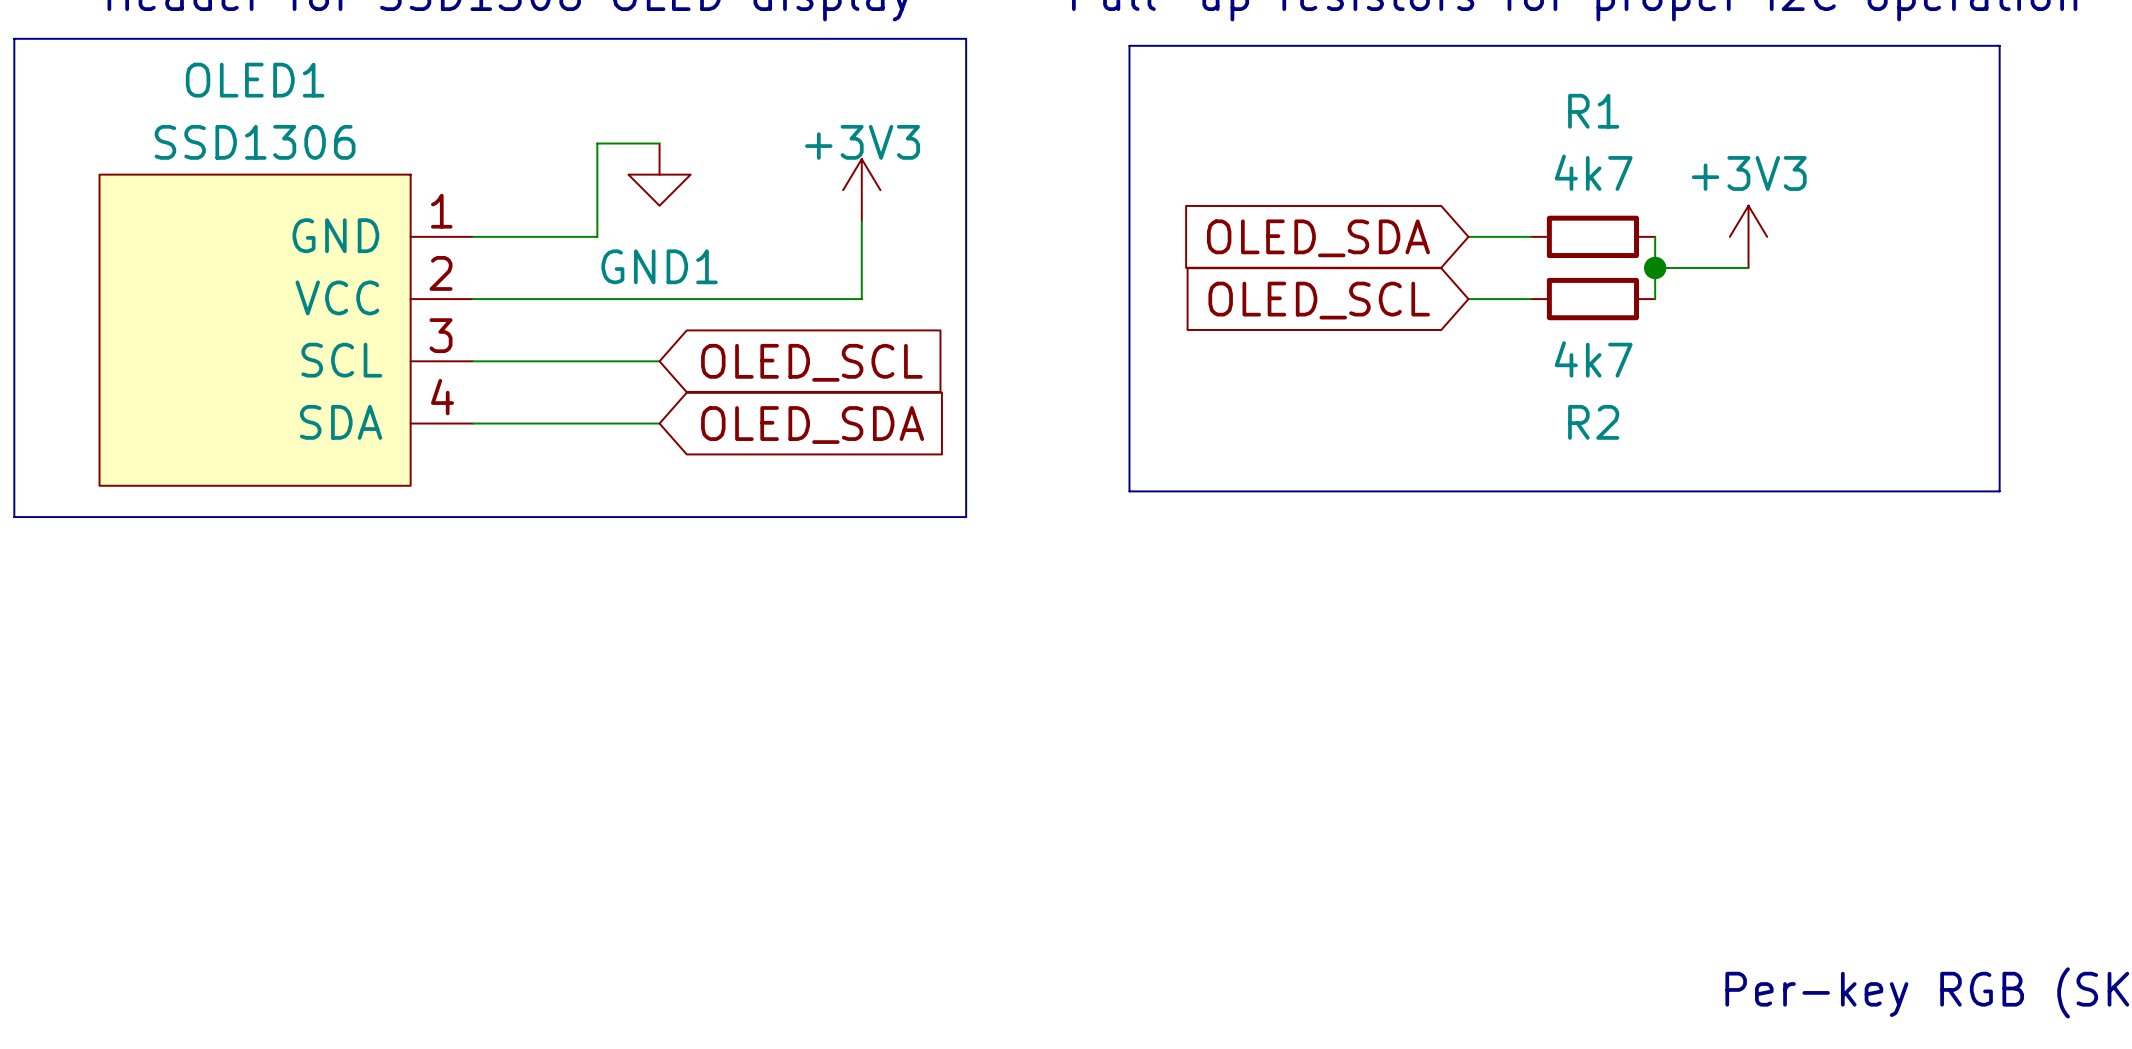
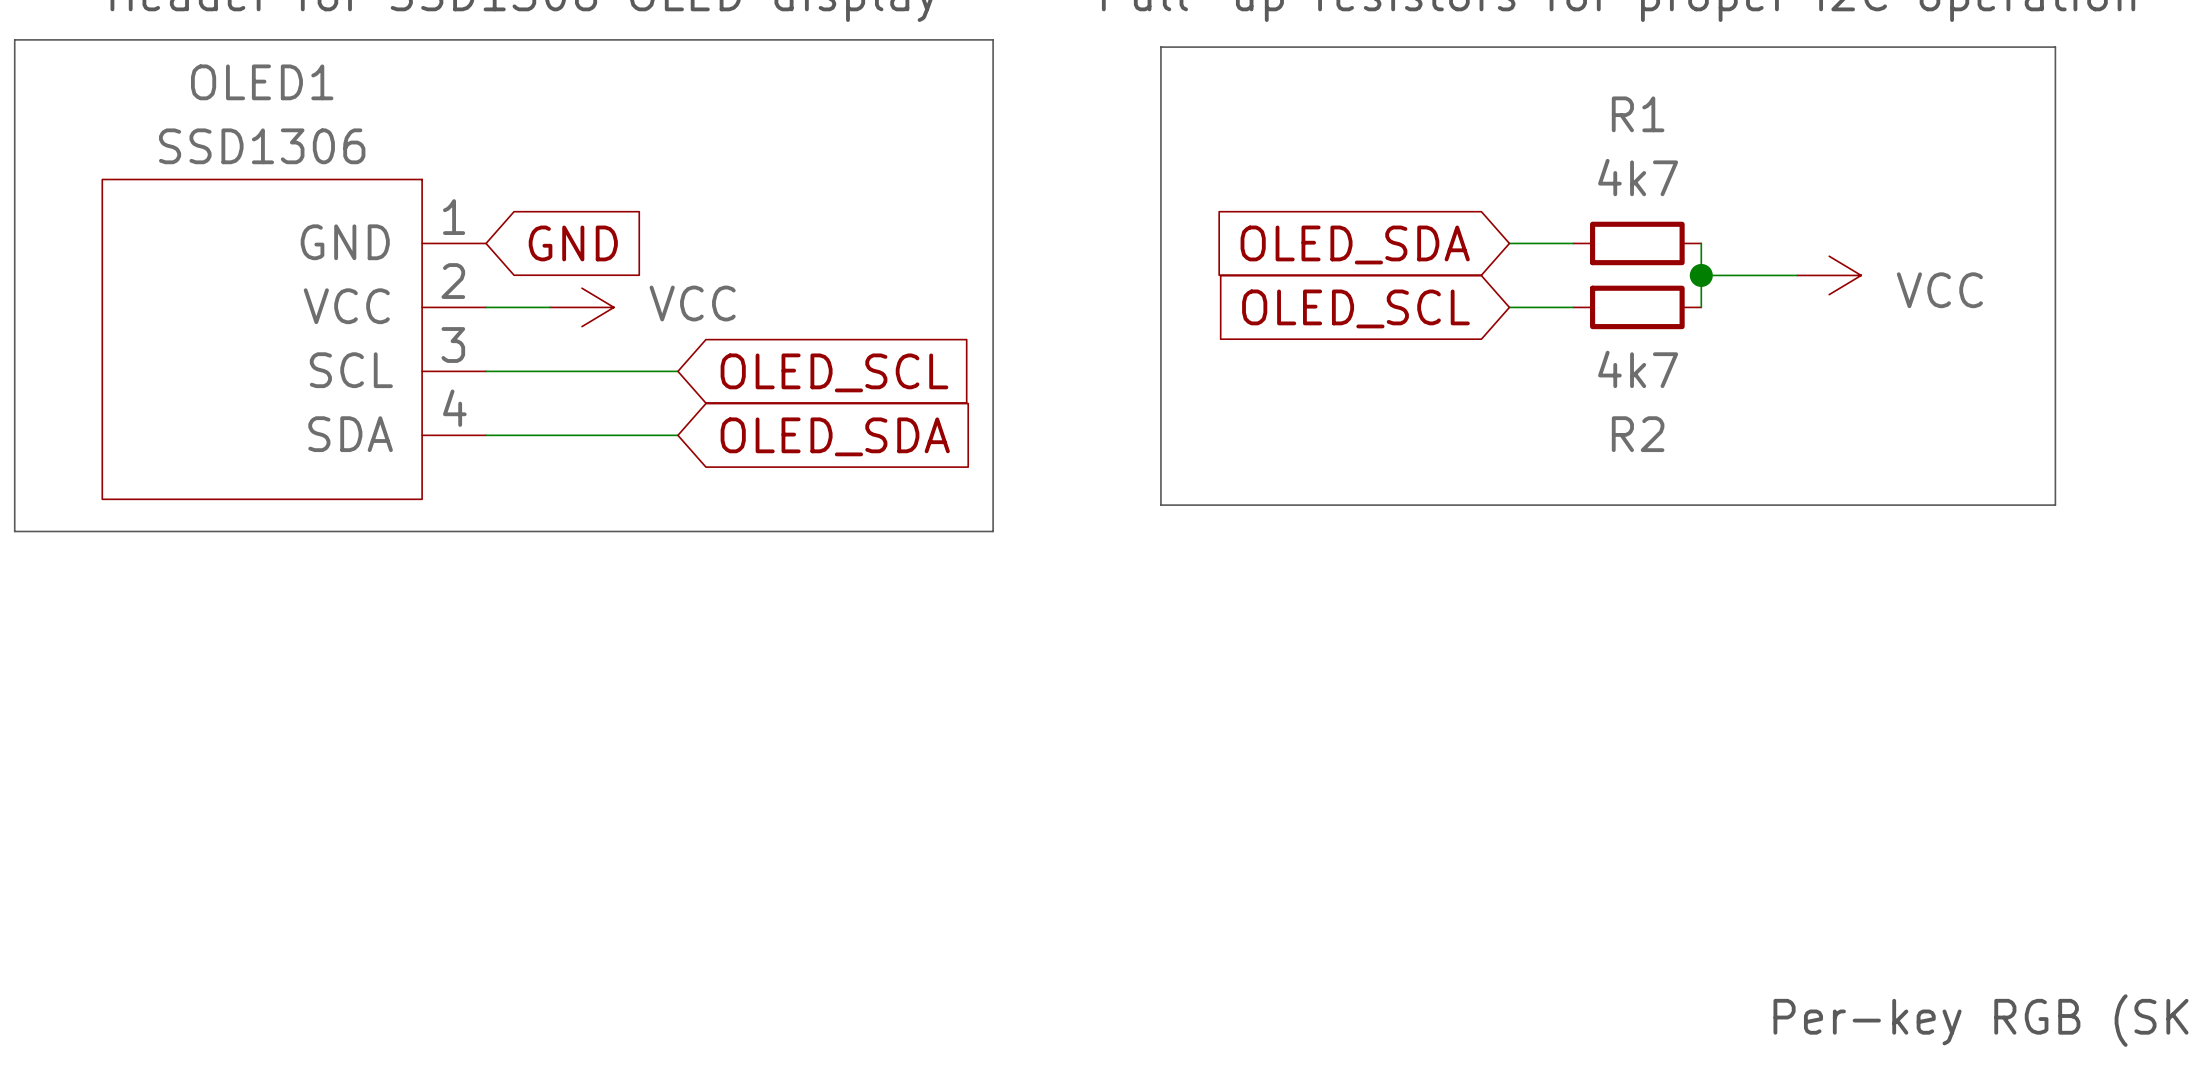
wire: (659, 143) (597, 143) (597, 236) (472, 236) -> none
power symbol: GND1 (659, 174) -> none
power symbol: +3V3 (861, 190) -> none
wire: (861, 221) (861, 299) (535, 299) -> none
global label: none -> GND (573, 243)
power symbol: +3V3 (1748, 236) -> none
power symbol: none -> VCC (1829, 275)
power symbol: none -> VCC (581, 307)

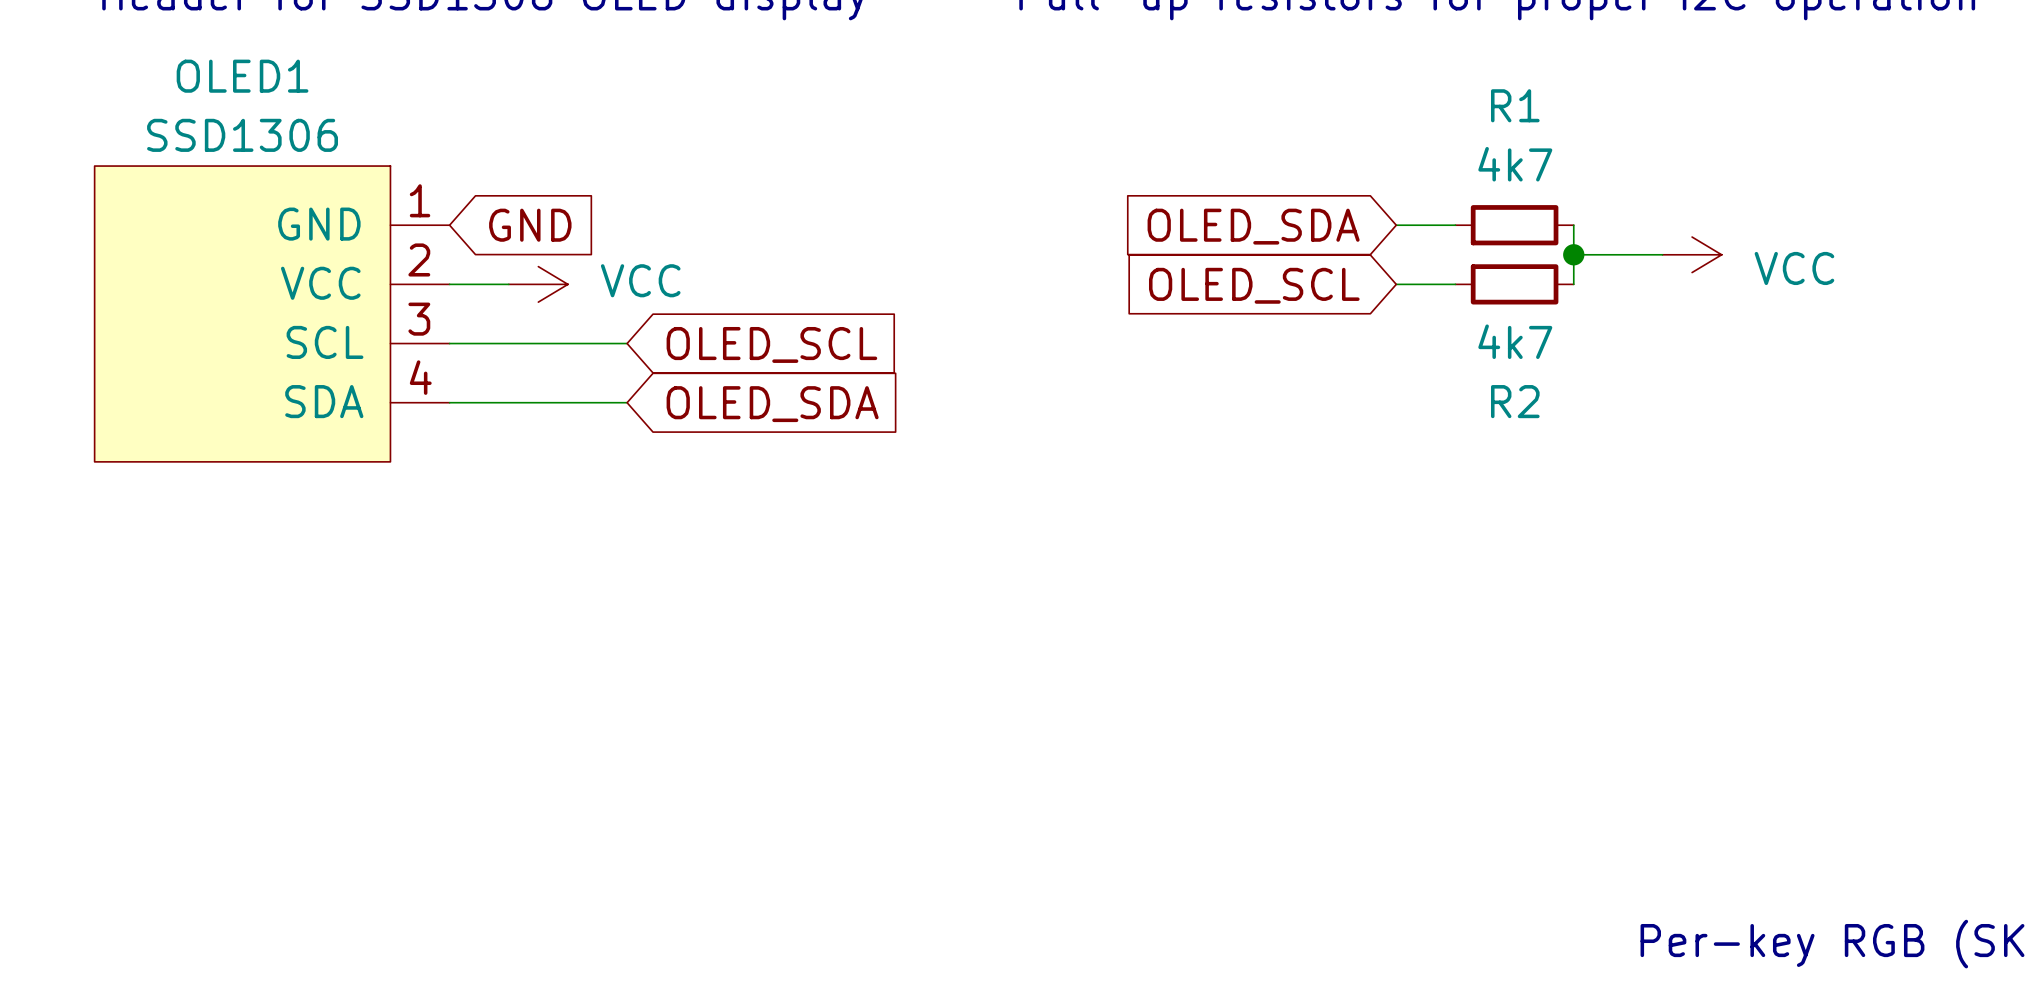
line: (14, 39) (993, 39) (993, 531) (14, 531) (14, 39) -> none
line: (1160, 47) (2055, 47) (2055, 505) (1160, 505) (1160, 47) -> none

